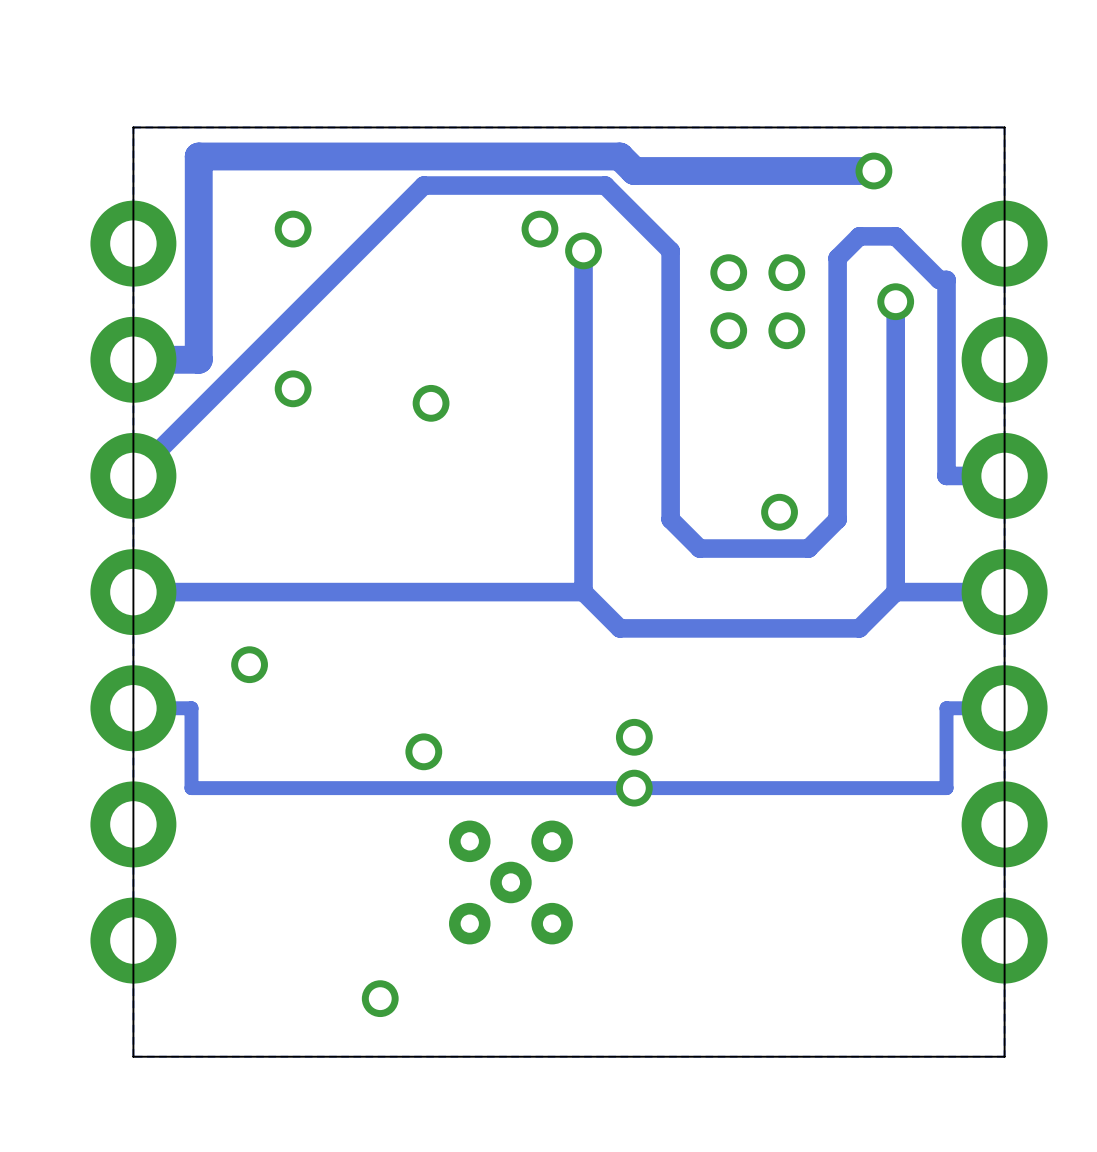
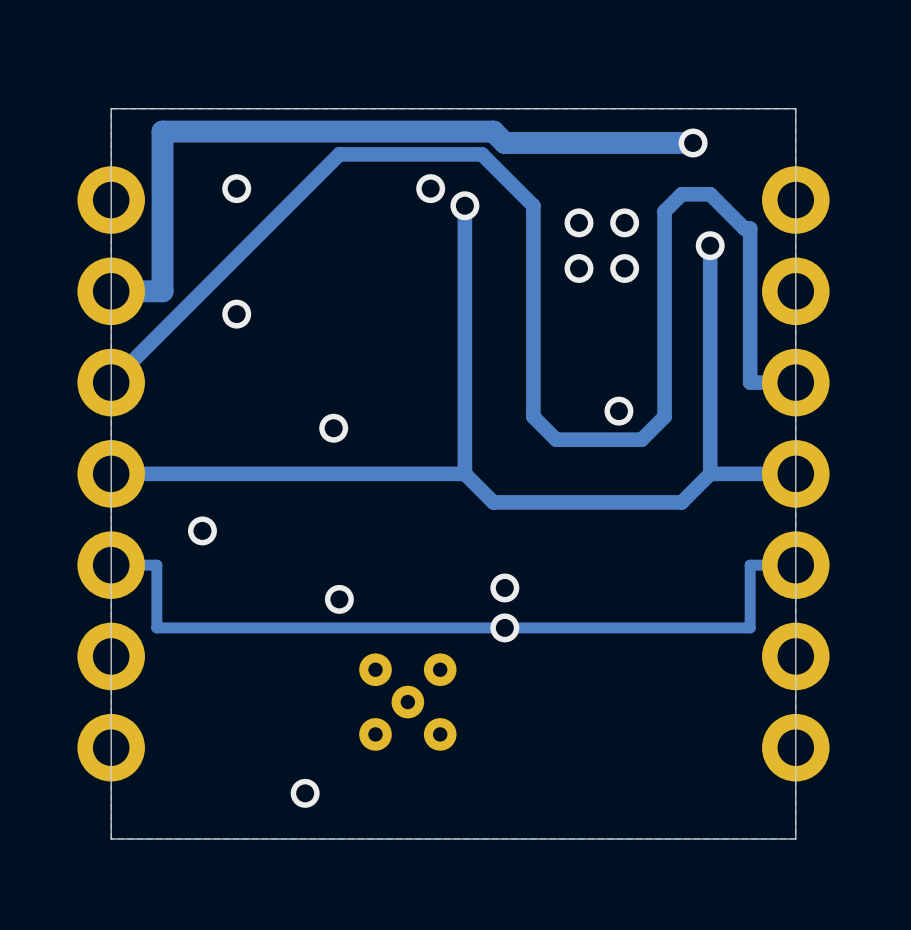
via position: (431, 403) -> (333, 428)

